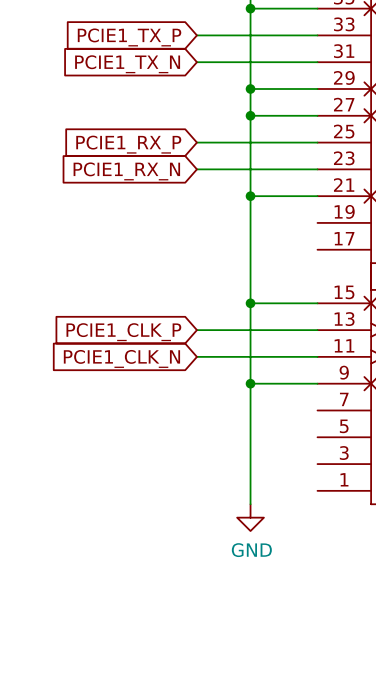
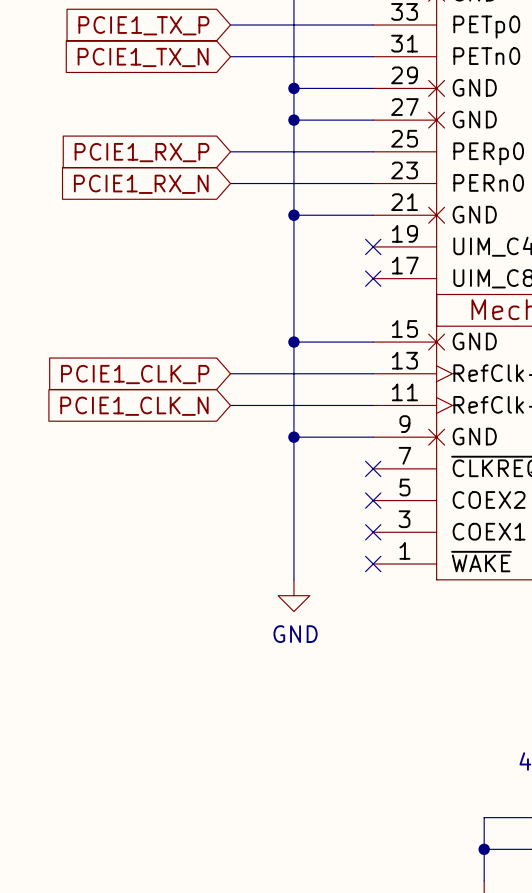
no-connect mark: none -> (373, 246)
no-connect mark: none -> (373, 278)
no-connect mark: none -> (373, 468)
no-connect mark: none -> (373, 500)
no-connect mark: none -> (373, 532)
no-connect mark: none -> (373, 563)

